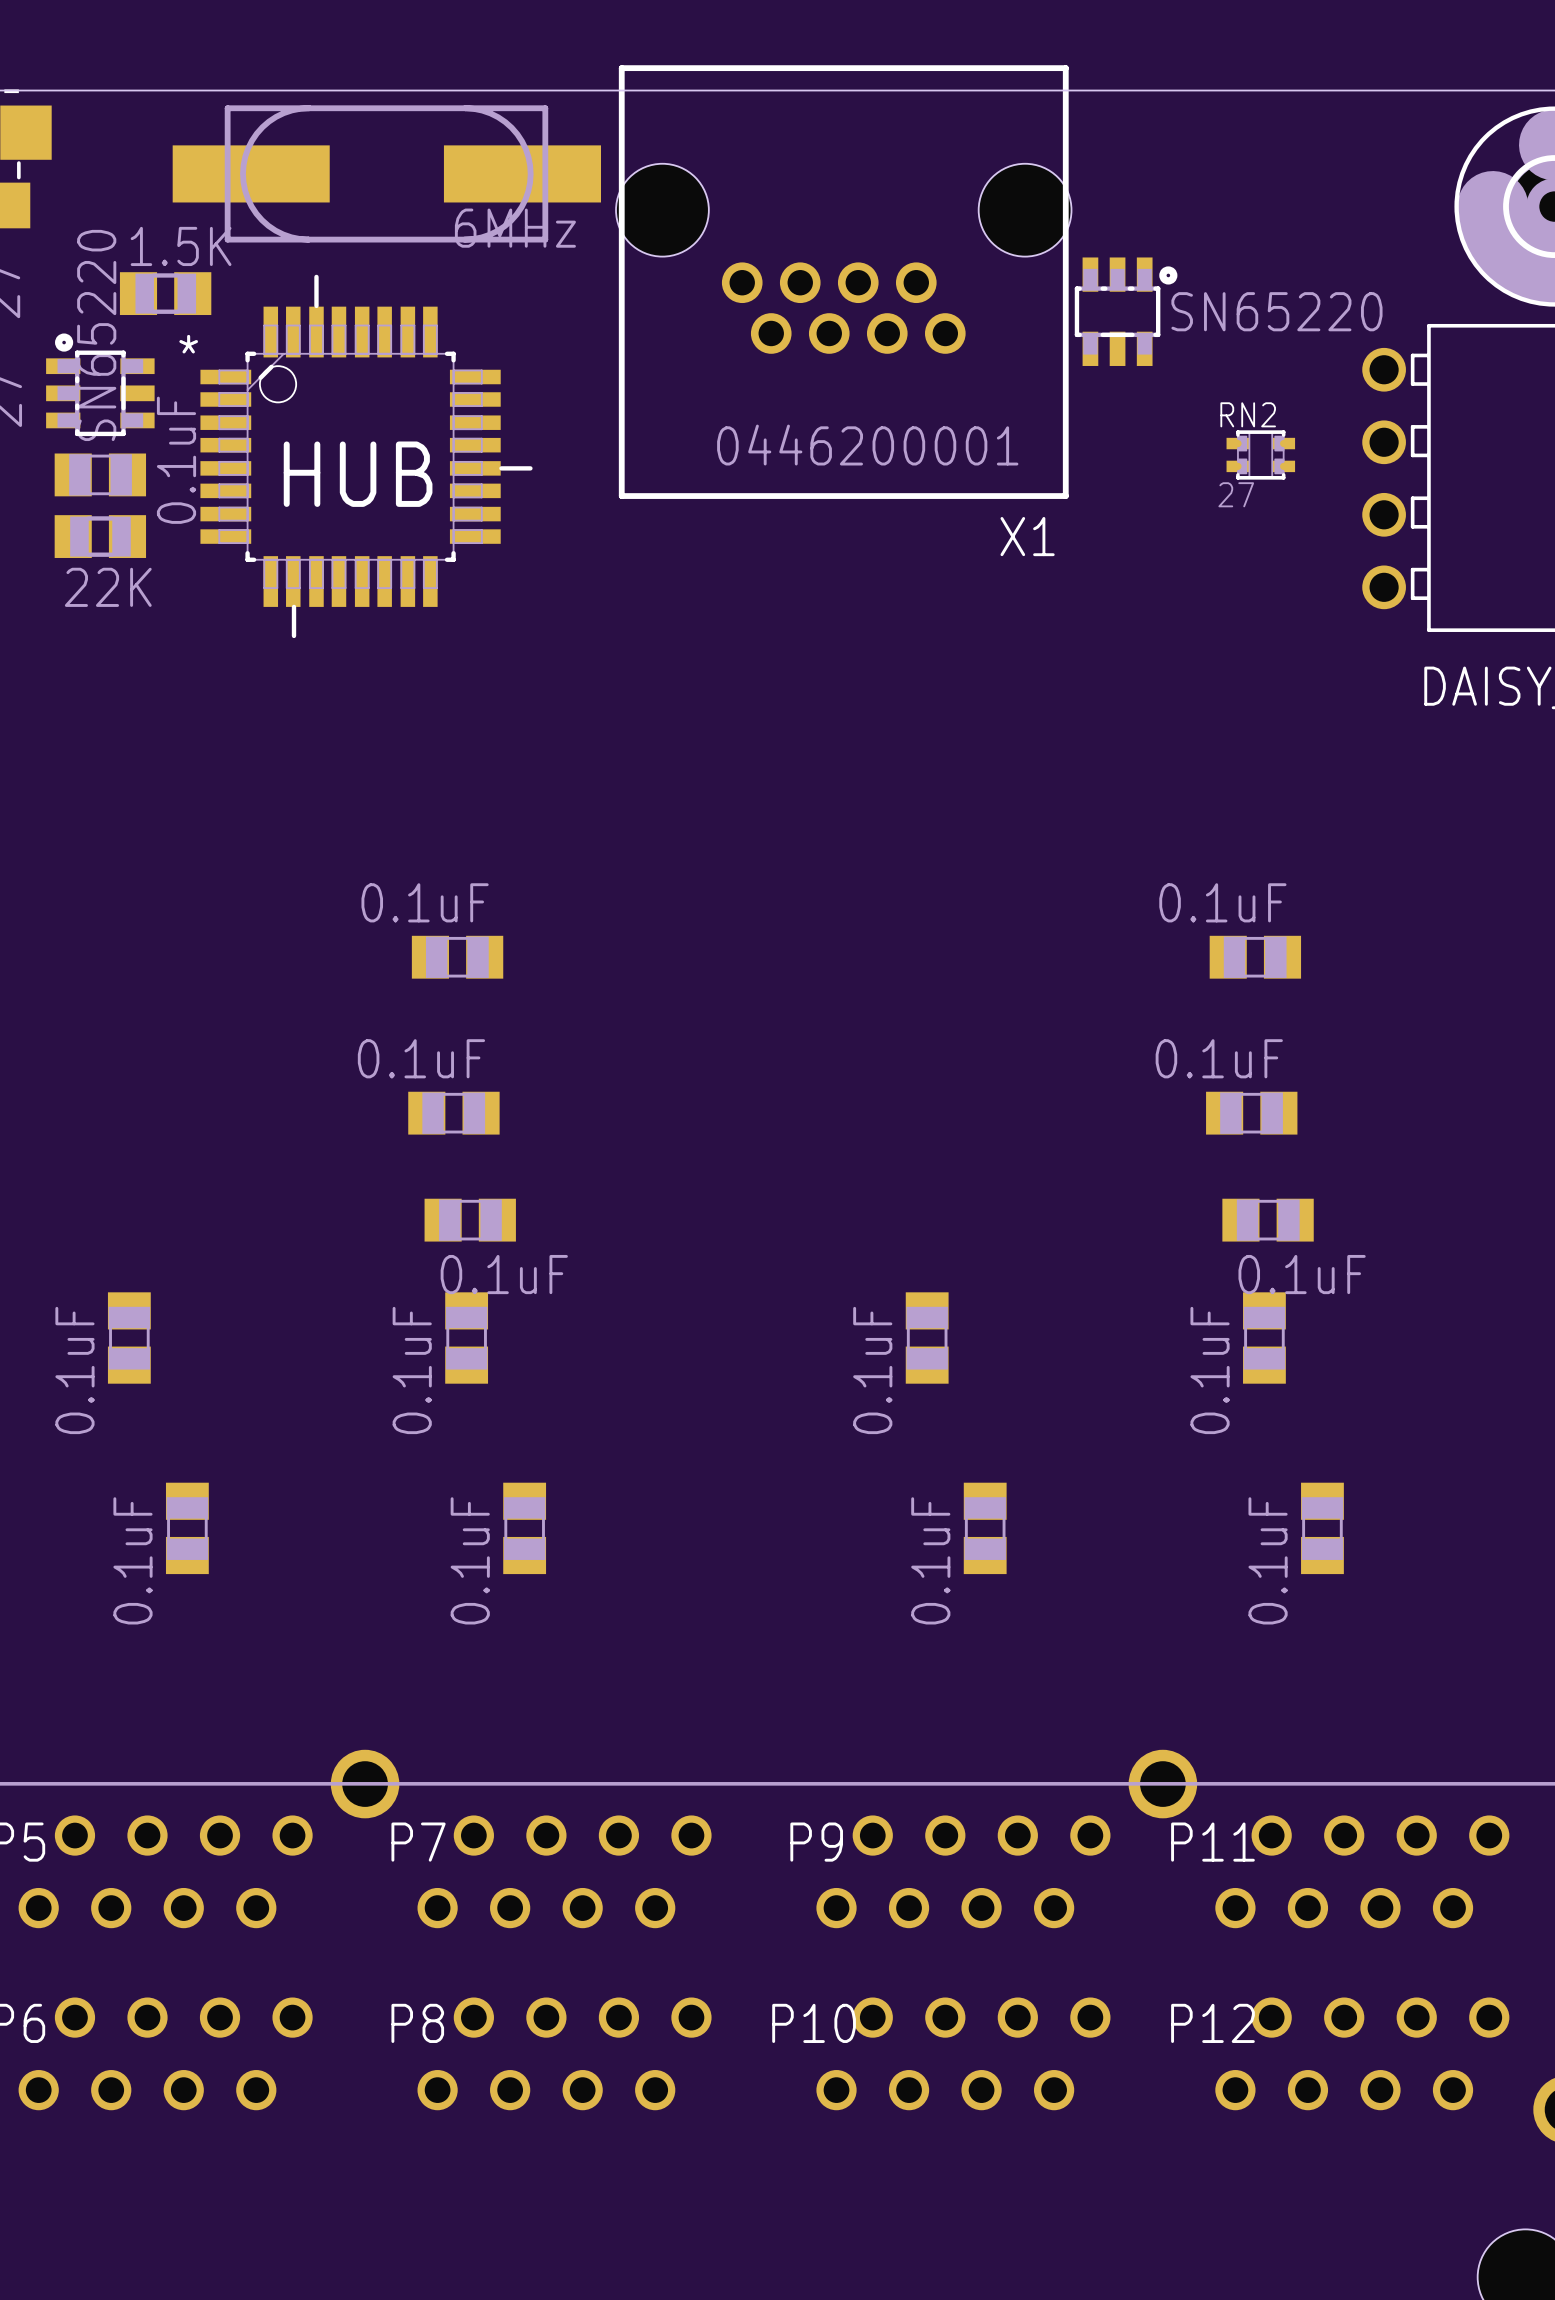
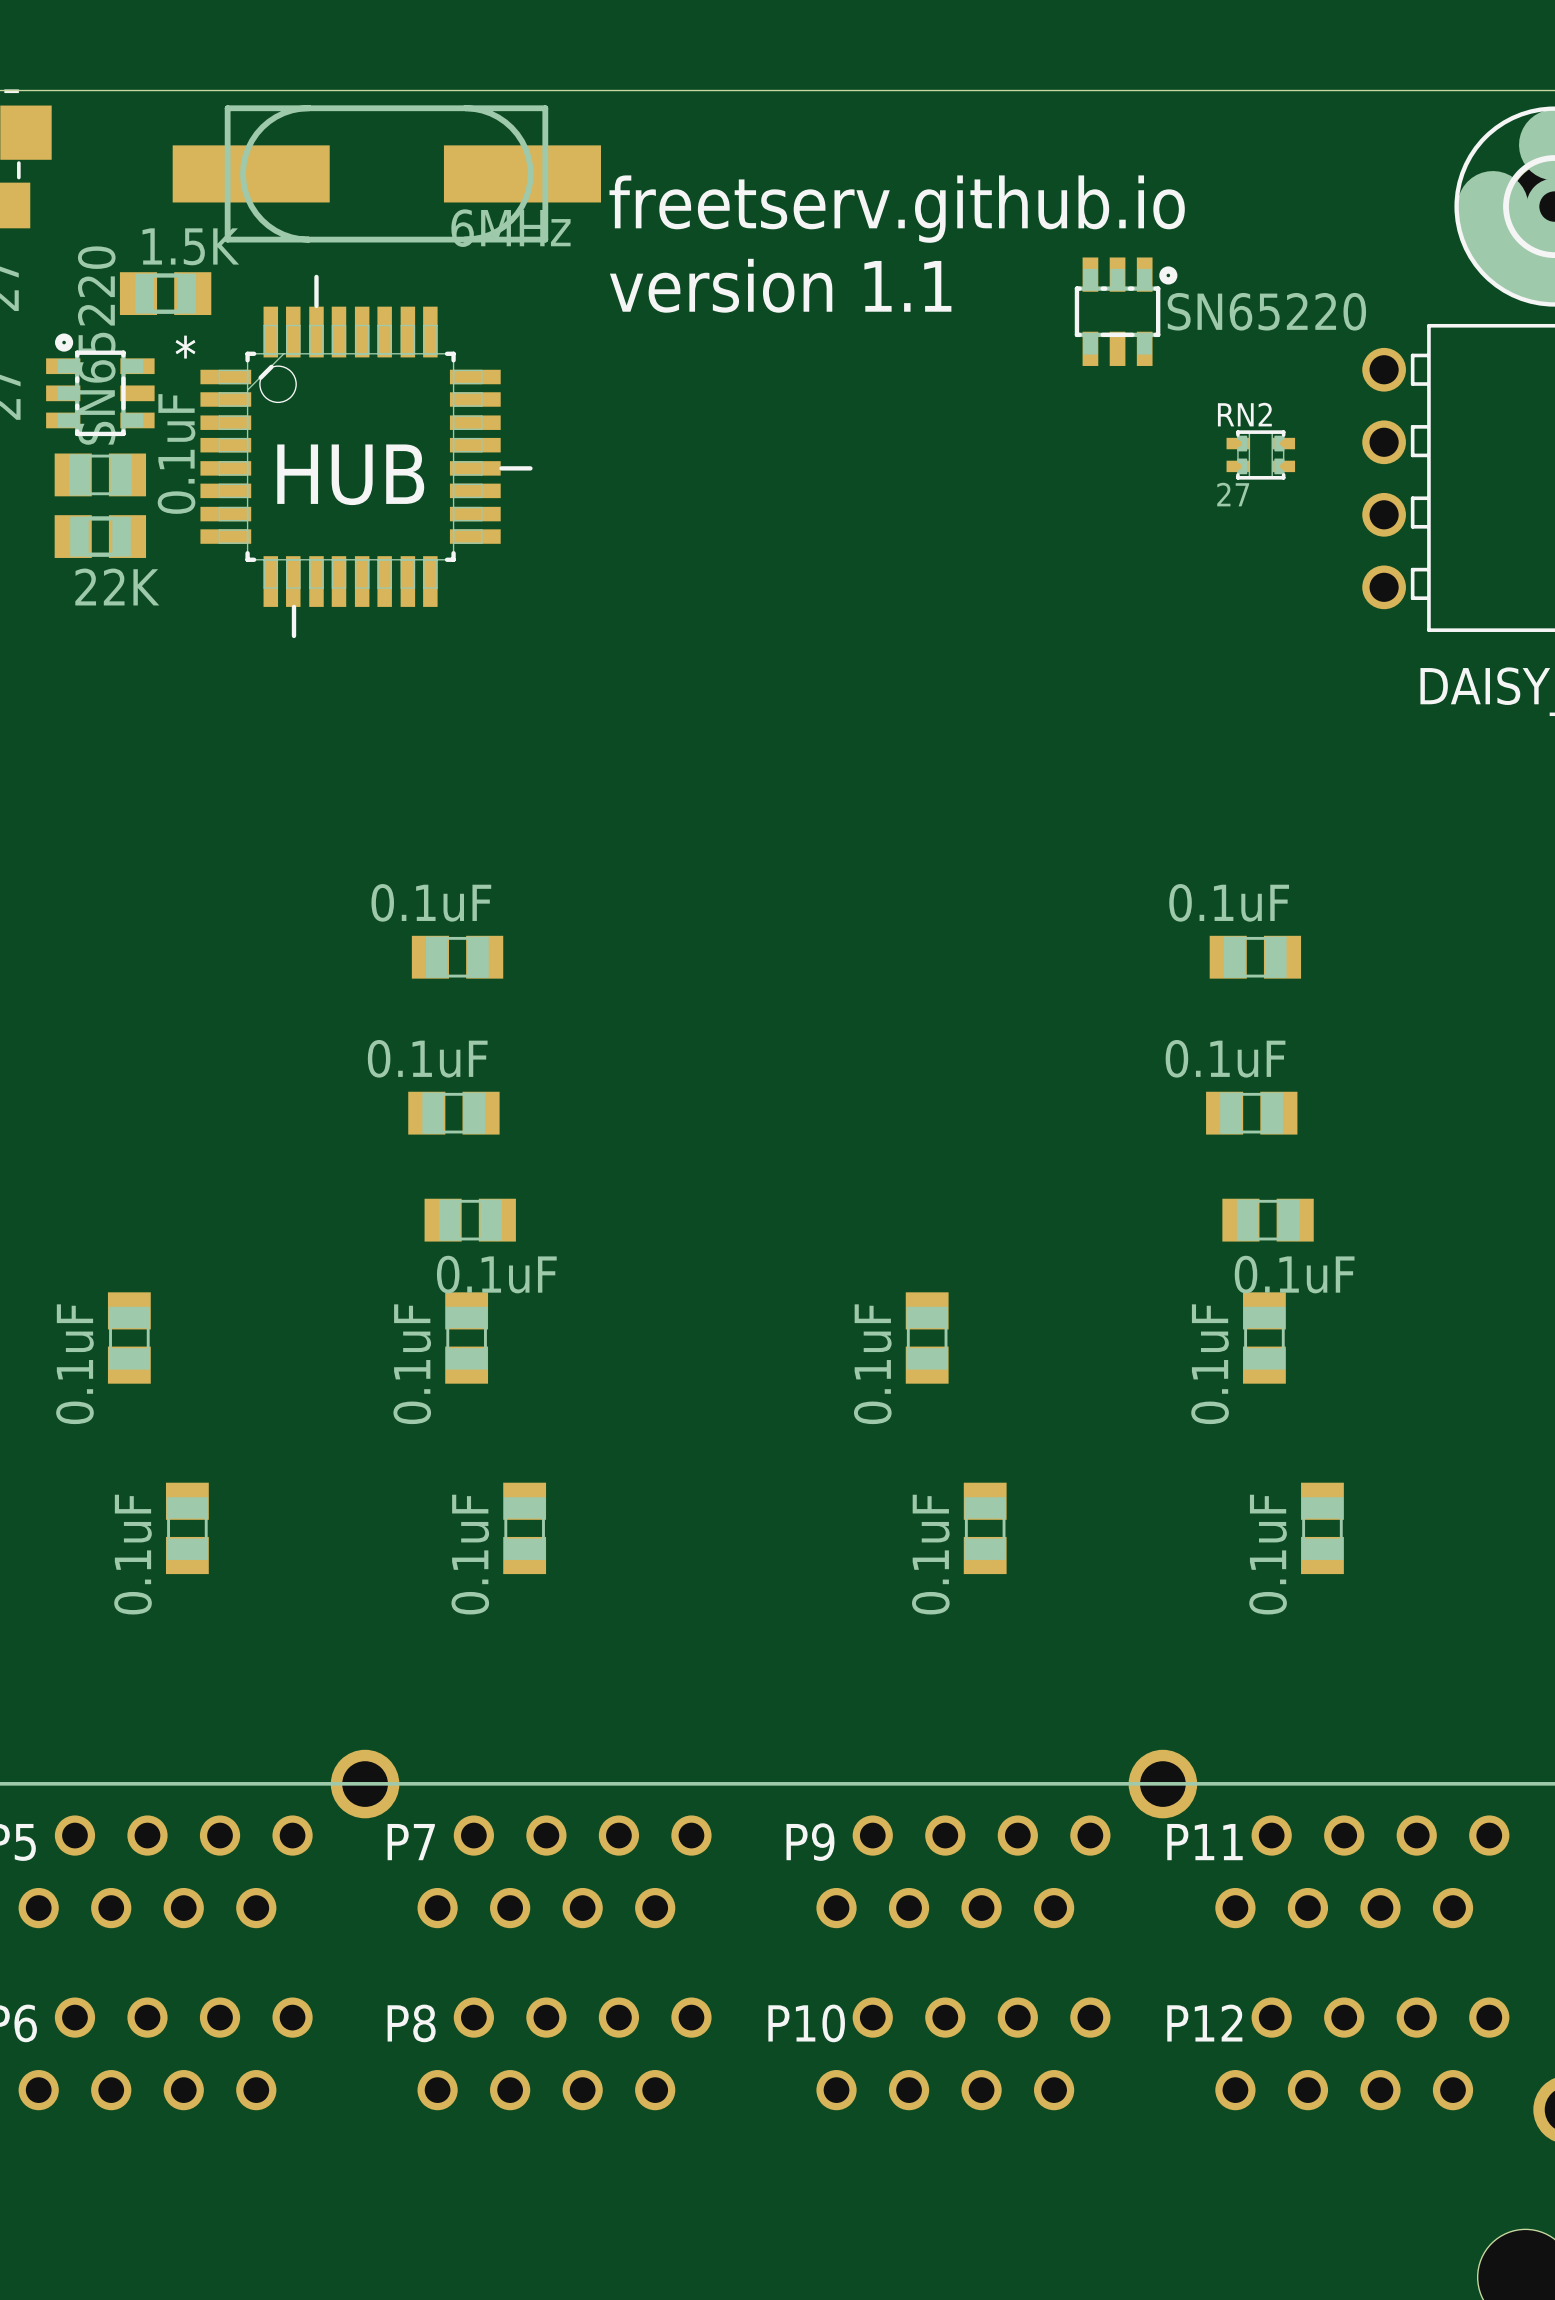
text: none -> freetserv.github.io (897, 209)
X1: 0446200001 (843, 282) -> none
text: none -> version 1.1 (780, 285)

